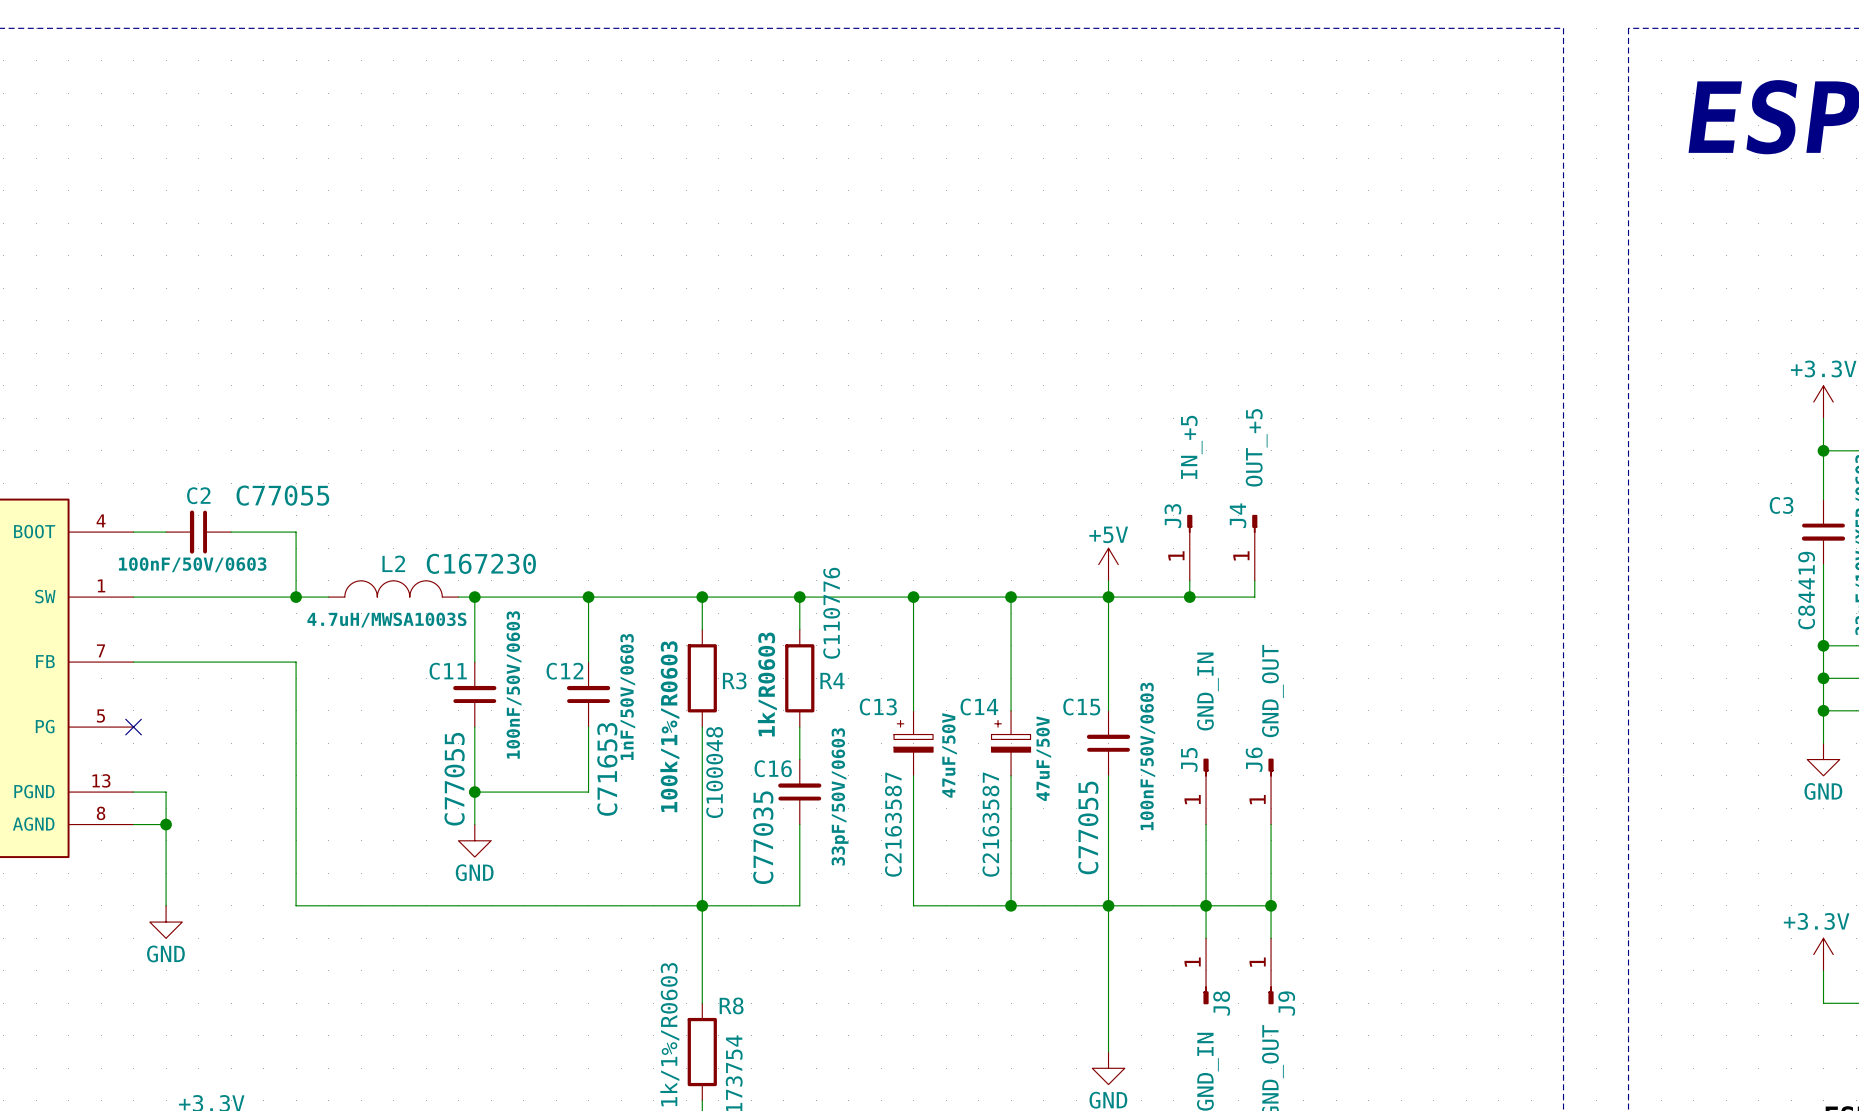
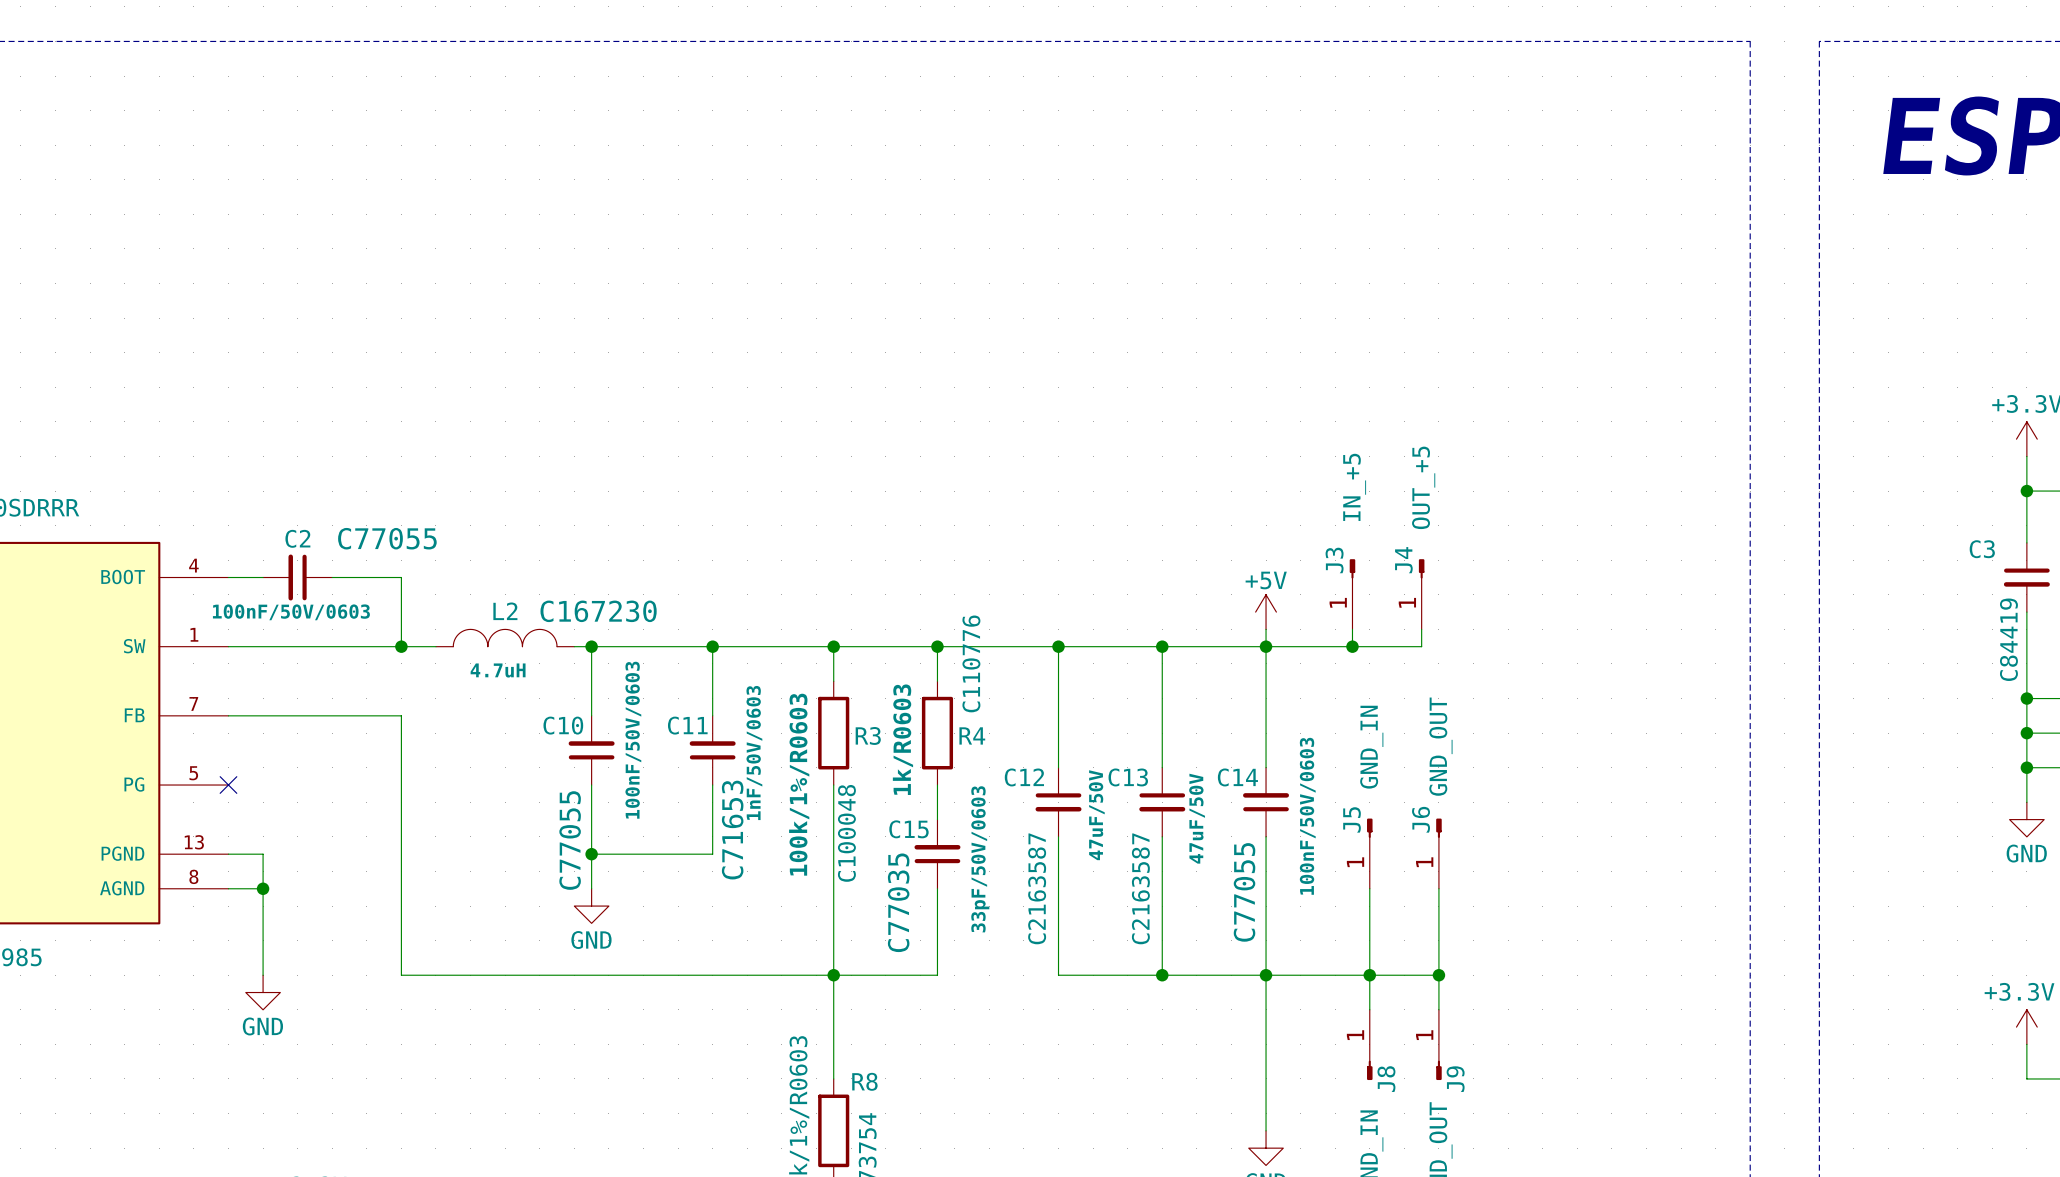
L2 value: 4.7uH/MWSA1003S (386, 620) -> 4.7uH (498, 670)
C11 name: C11 (448, 671) -> C10 (563, 725)
C12 name: C12 (564, 671) -> C11 (687, 725)
C15 name: C15 (1081, 706) -> C14 (1237, 777)
C13 symbol: [894, 710, 934, 776] -> [1139, 767, 1186, 837]
C12: none -> 47uF/50V (1058, 802)
C14: 47uF/50V (1011, 743) -> none
C16 name: C16 (773, 768) -> C15 (908, 829)

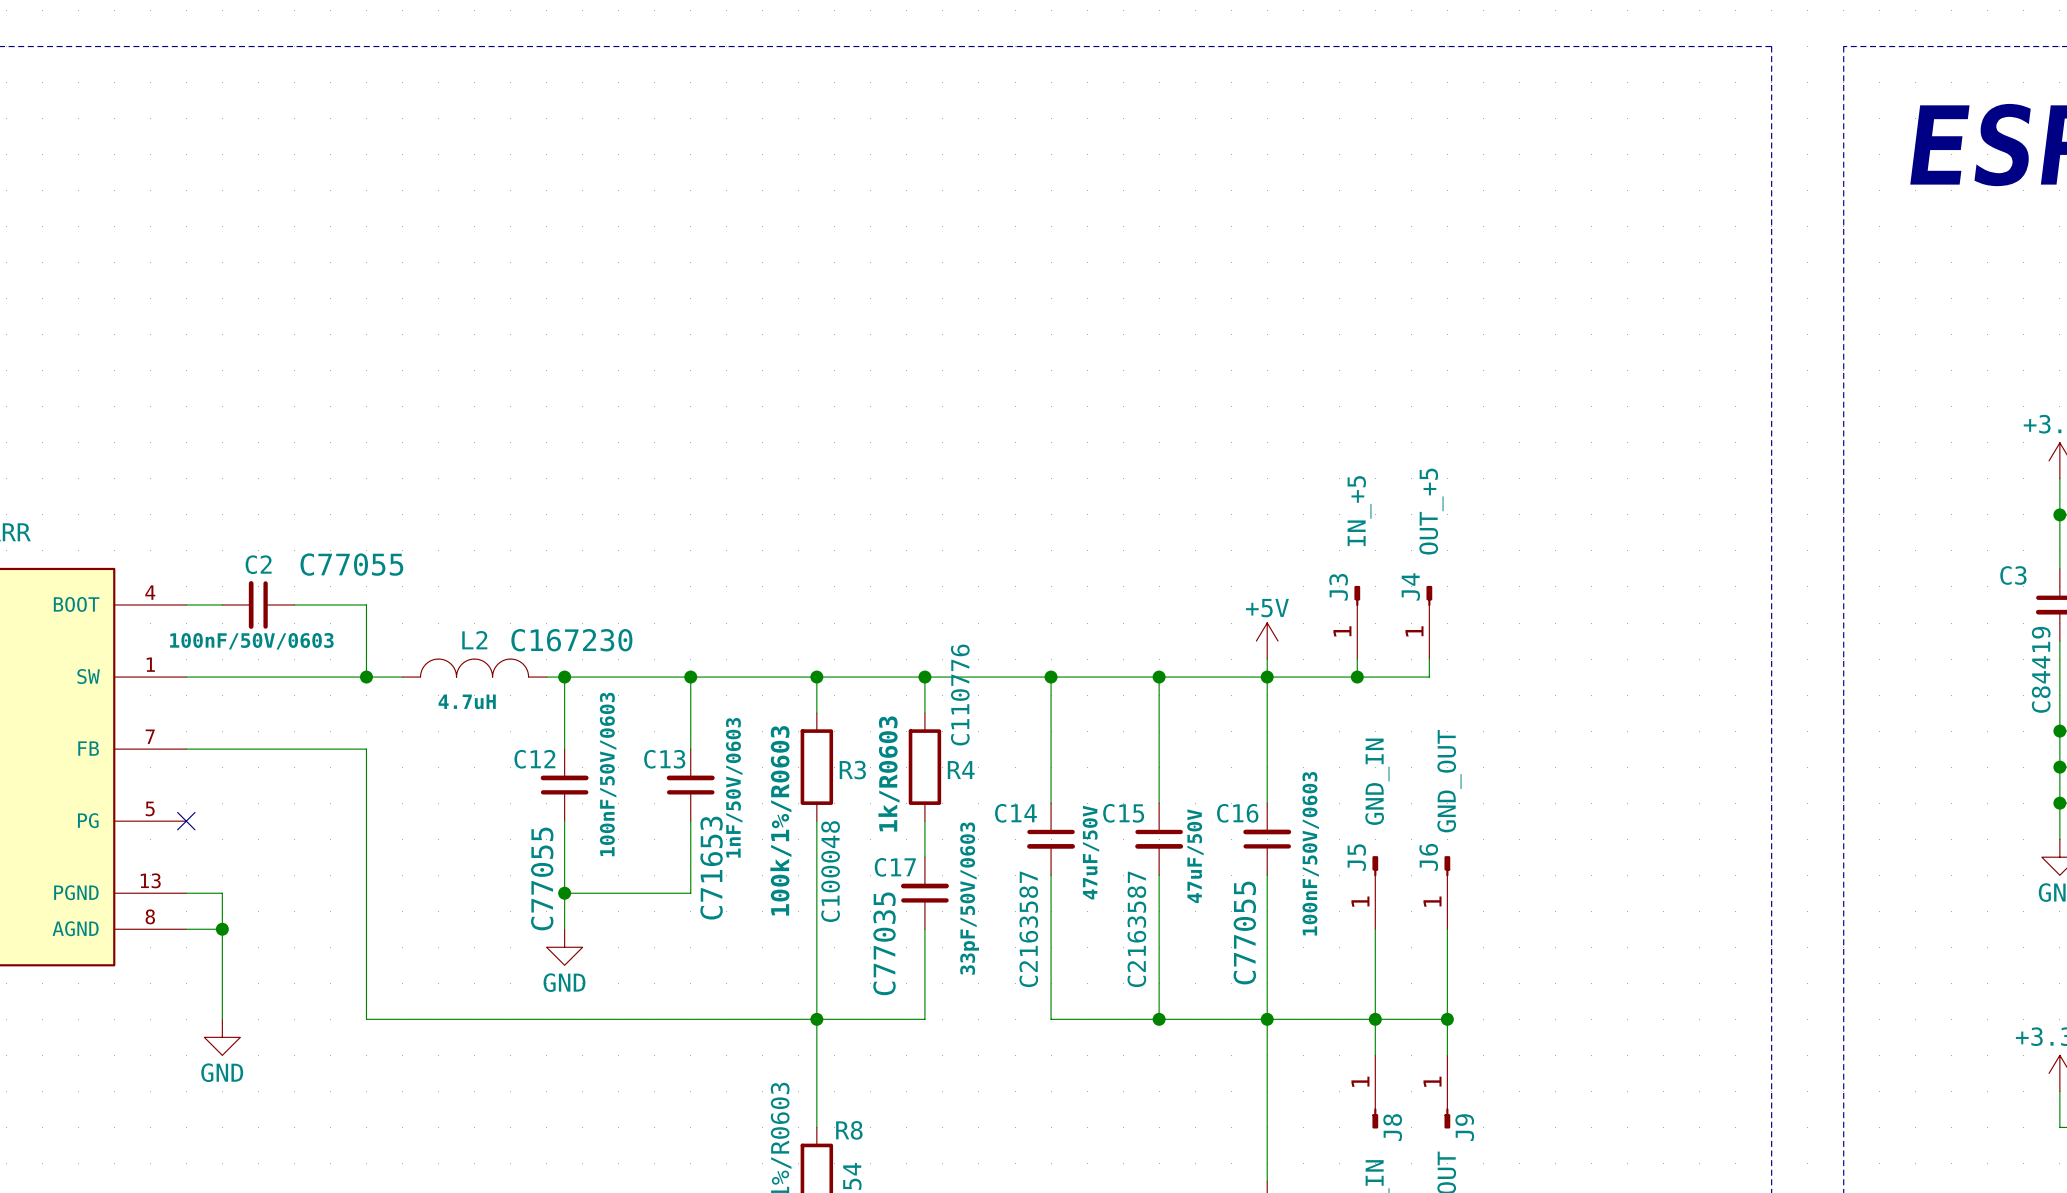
C10 name: C10 (563, 725) -> C12 (534, 759)
C11 name: C11 (687, 725) -> C13 (664, 759)
C12 name: C12 (1024, 777) -> C14 (1015, 813)
C13 name: C13 (1128, 777) -> C15 (1123, 813)
C14 name: C14 (1237, 777) -> C16 (1237, 813)
C15 name: C15 (908, 829) -> C17 (895, 867)

